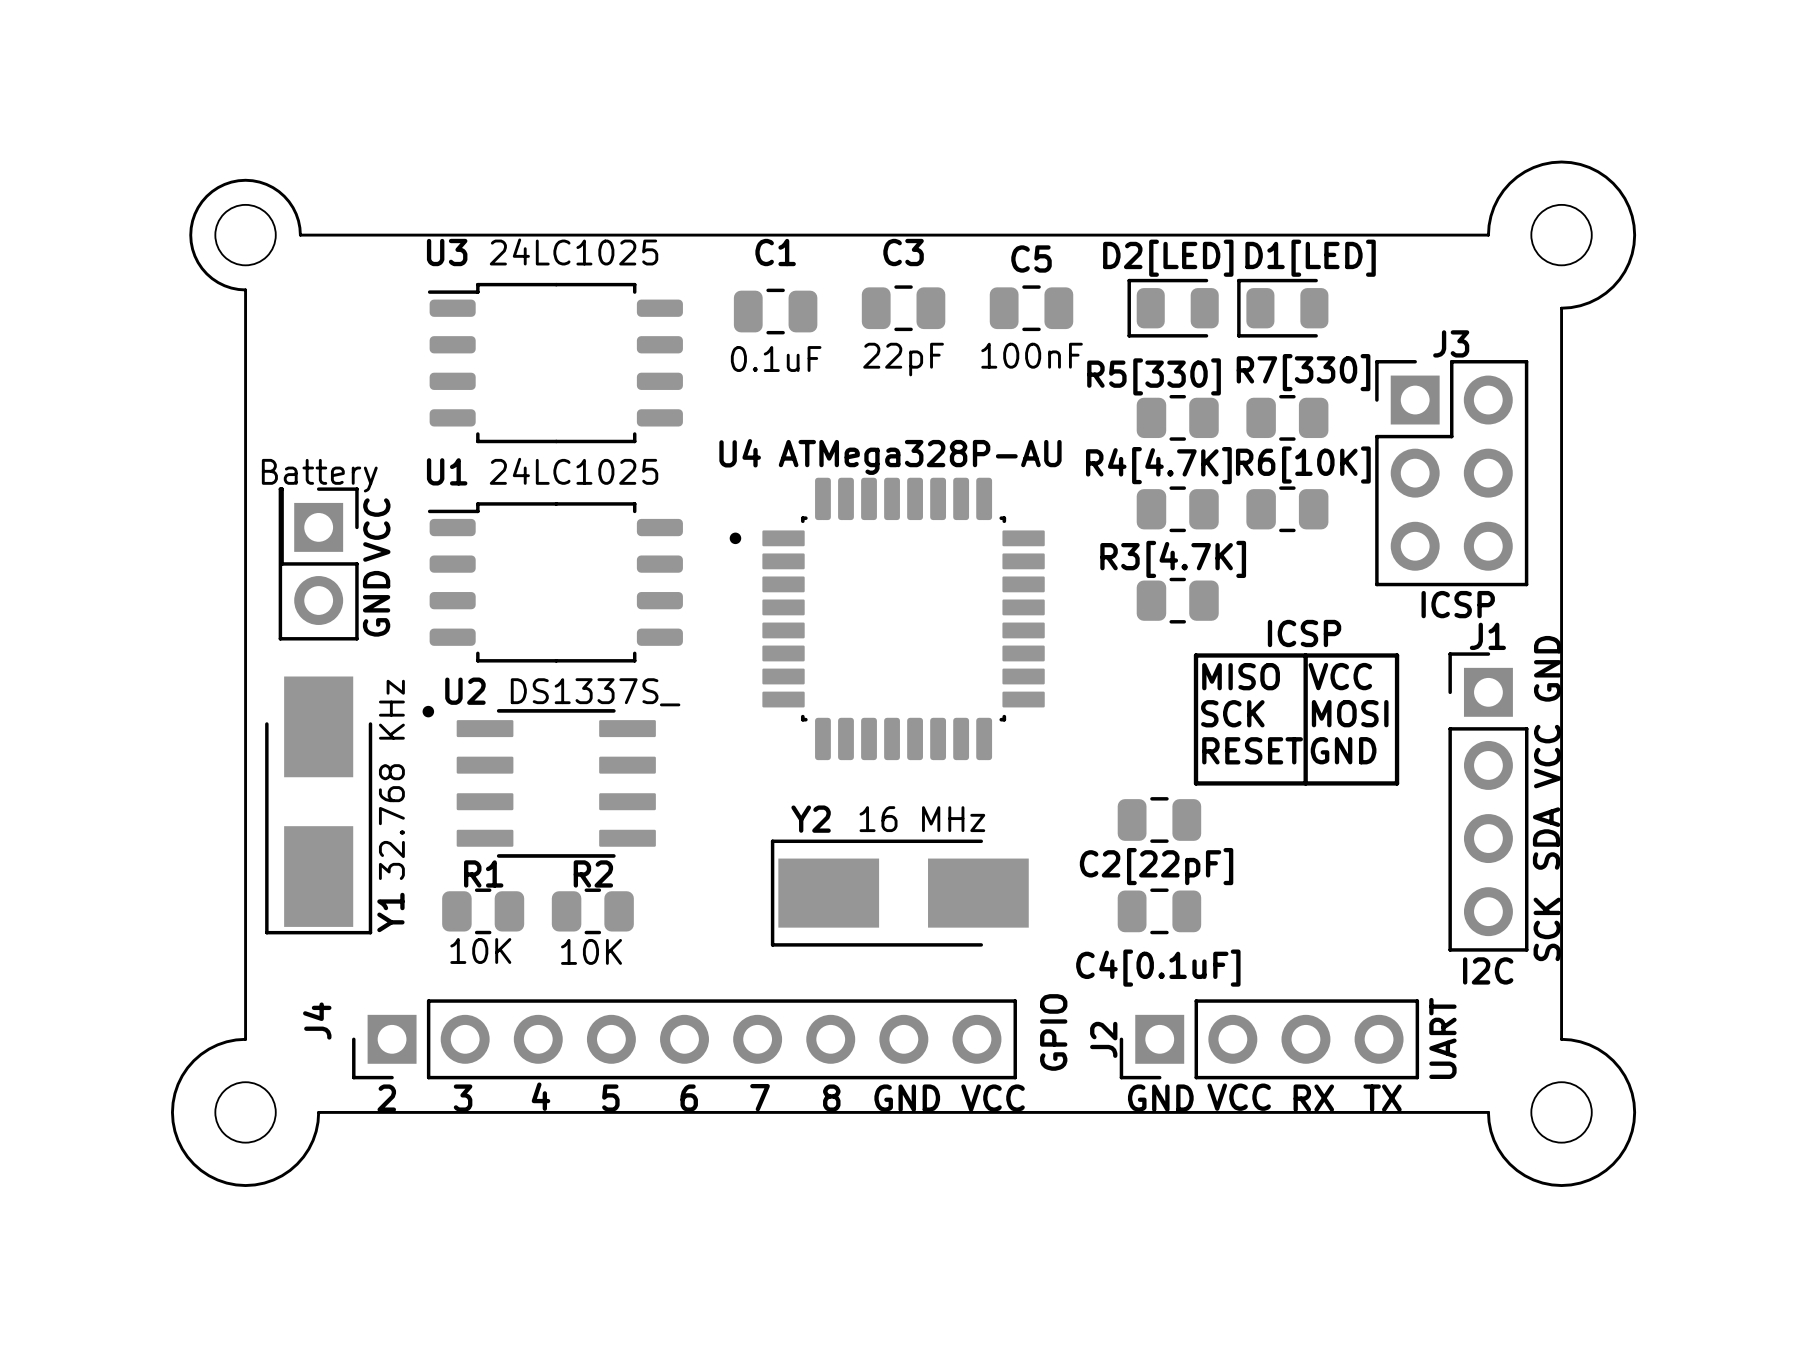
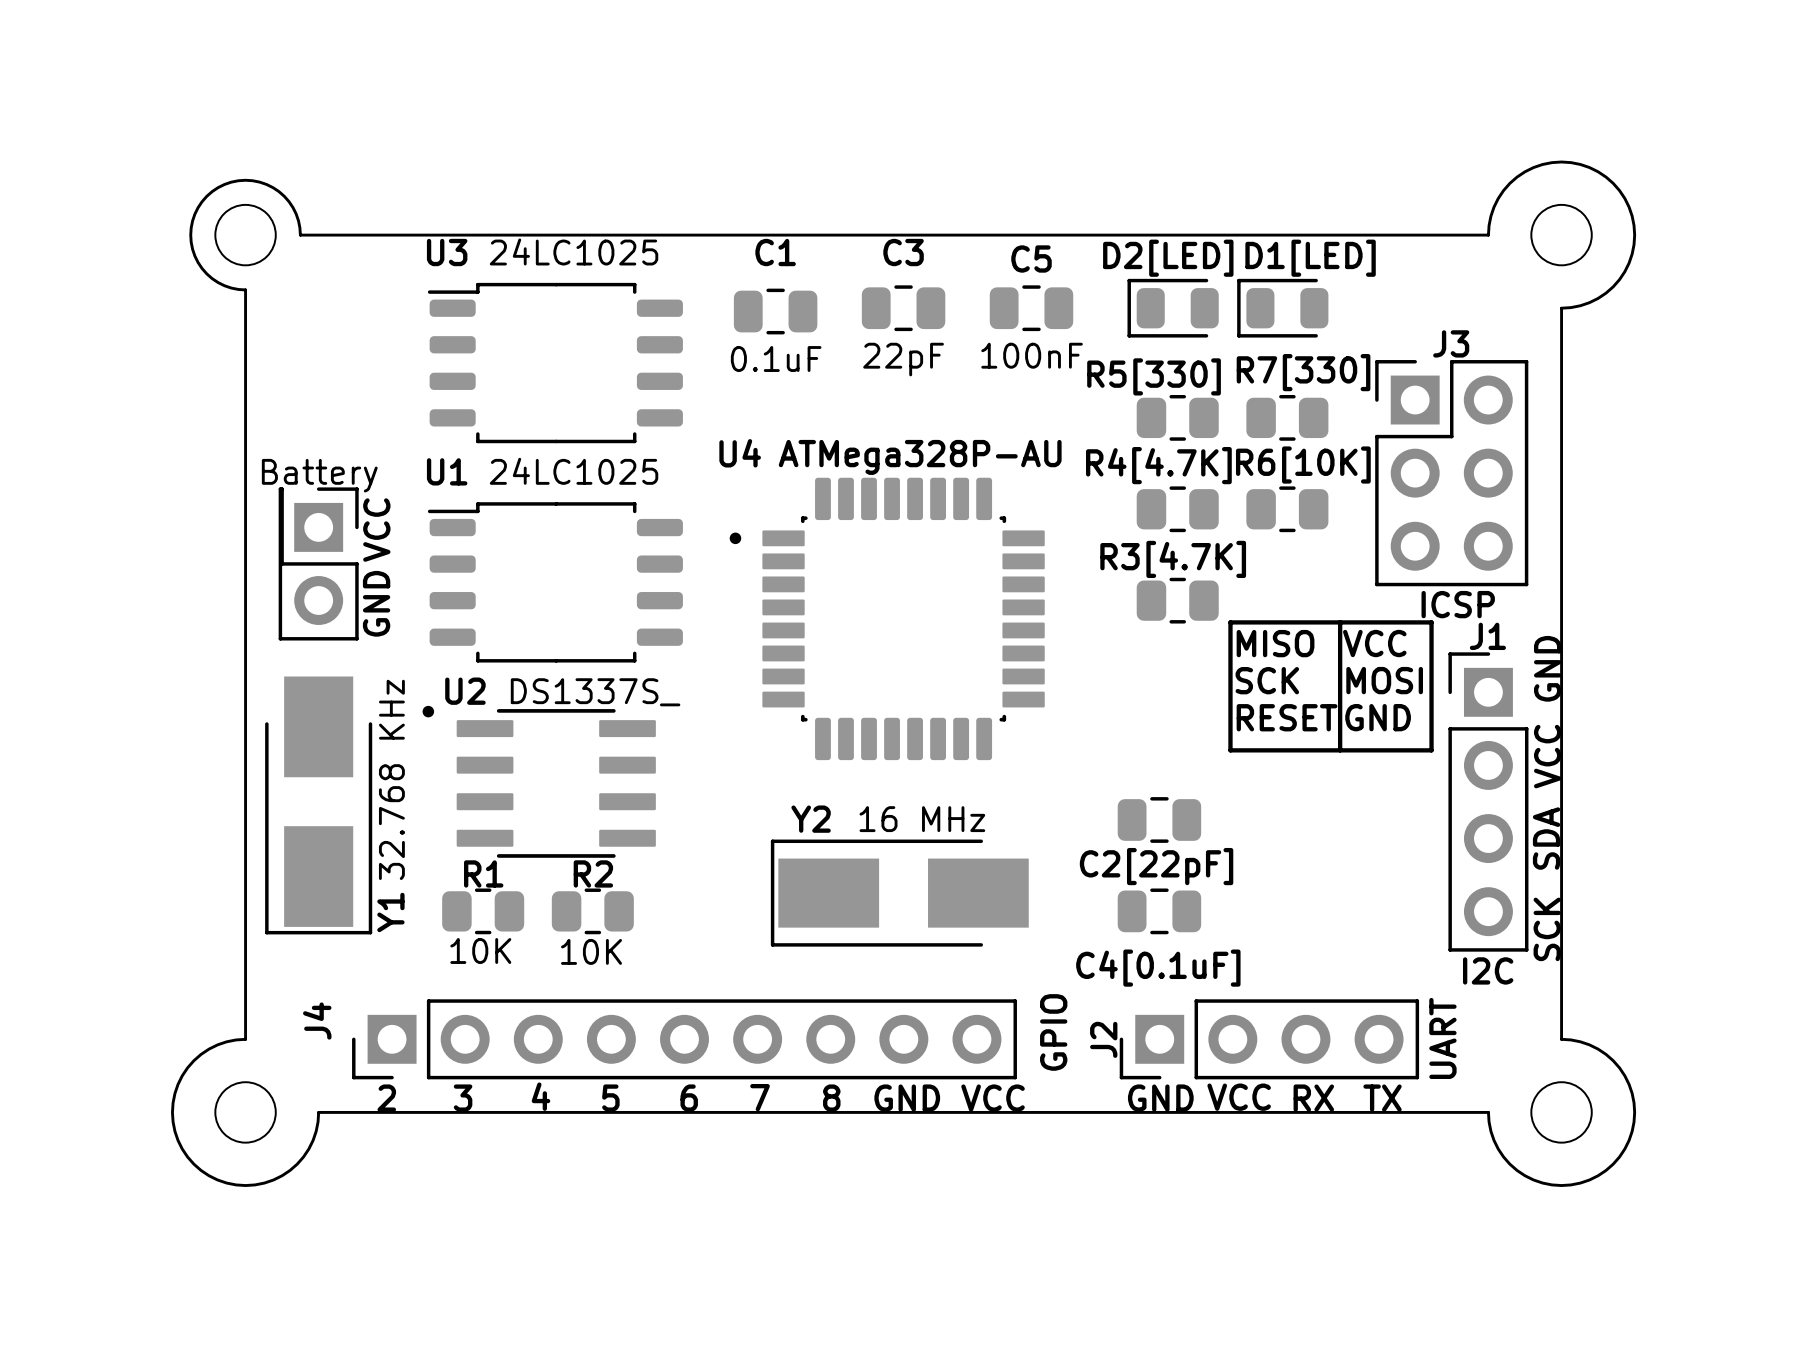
text: ICSP (1304, 633) -> none
line: (1196, 655) (1196, 783) (1397, 783) (1397, 655) (1196, 655) -> (1230, 622) (1230, 750) (1431, 750) (1431, 622) (1230, 622)
line: (1305, 655) (1305, 783) -> (1340, 622) (1340, 750)
text position: MISO (1241, 676) -> MISO (1275, 643)
text position: VCC (1340, 676) -> VCC (1374, 643)
text position: SCK (1232, 713) -> SCK (1267, 680)
text position: MOSI (1350, 713) -> MOSI (1384, 680)
text position: RESET (1252, 750) -> RESET (1287, 717)
text position: GND (1343, 750) -> GND (1378, 717)

